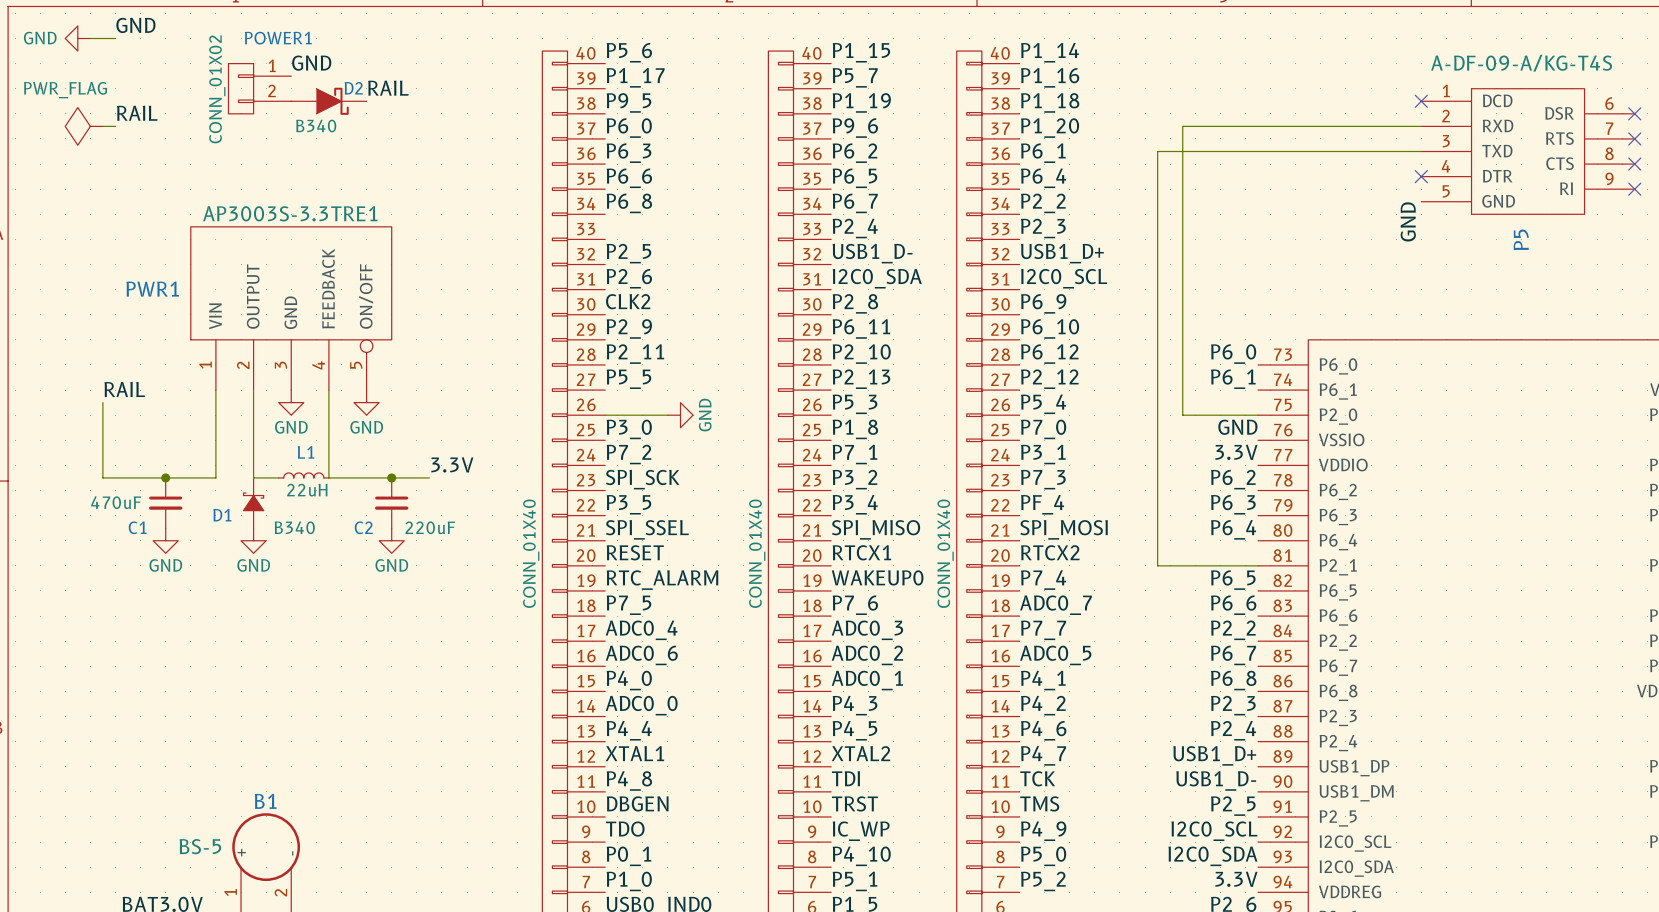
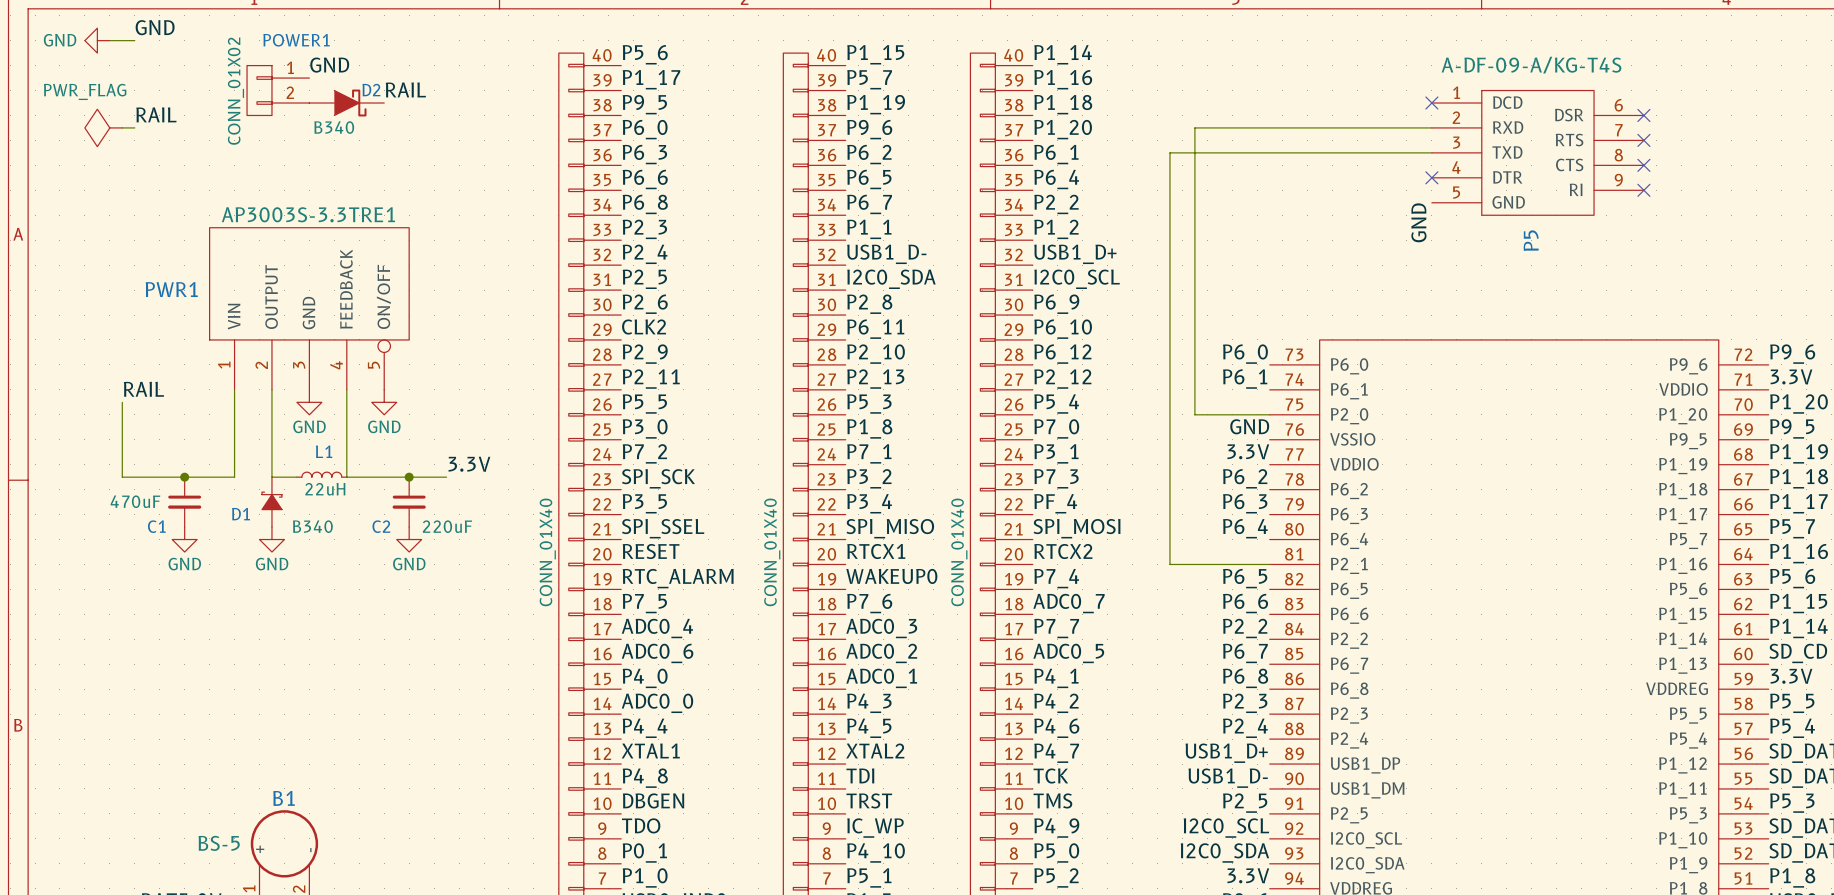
label: none -> P2_3 (644, 229)
label: P2_4 (855, 228) -> P1_1 (869, 229)
label: P2_3 (1043, 228) -> P1_2 (1056, 229)
label: P2_5 (628, 253) -> P2_4 (645, 254)
label: P2_6 (629, 278) -> P2_5 (644, 279)
label: CLK2 (628, 301) -> P2_6 (645, 304)
label: P2_9 (629, 328) -> CLK2 (644, 327)
label: P2_11 (635, 354) -> P2_9 (645, 354)
label: P5_5 (628, 379) -> P2_11 (651, 379)
label: none -> P5_5 (644, 404)
wire: (605, 415) (667, 415) -> none
power symbol: GND (680, 415) -> none

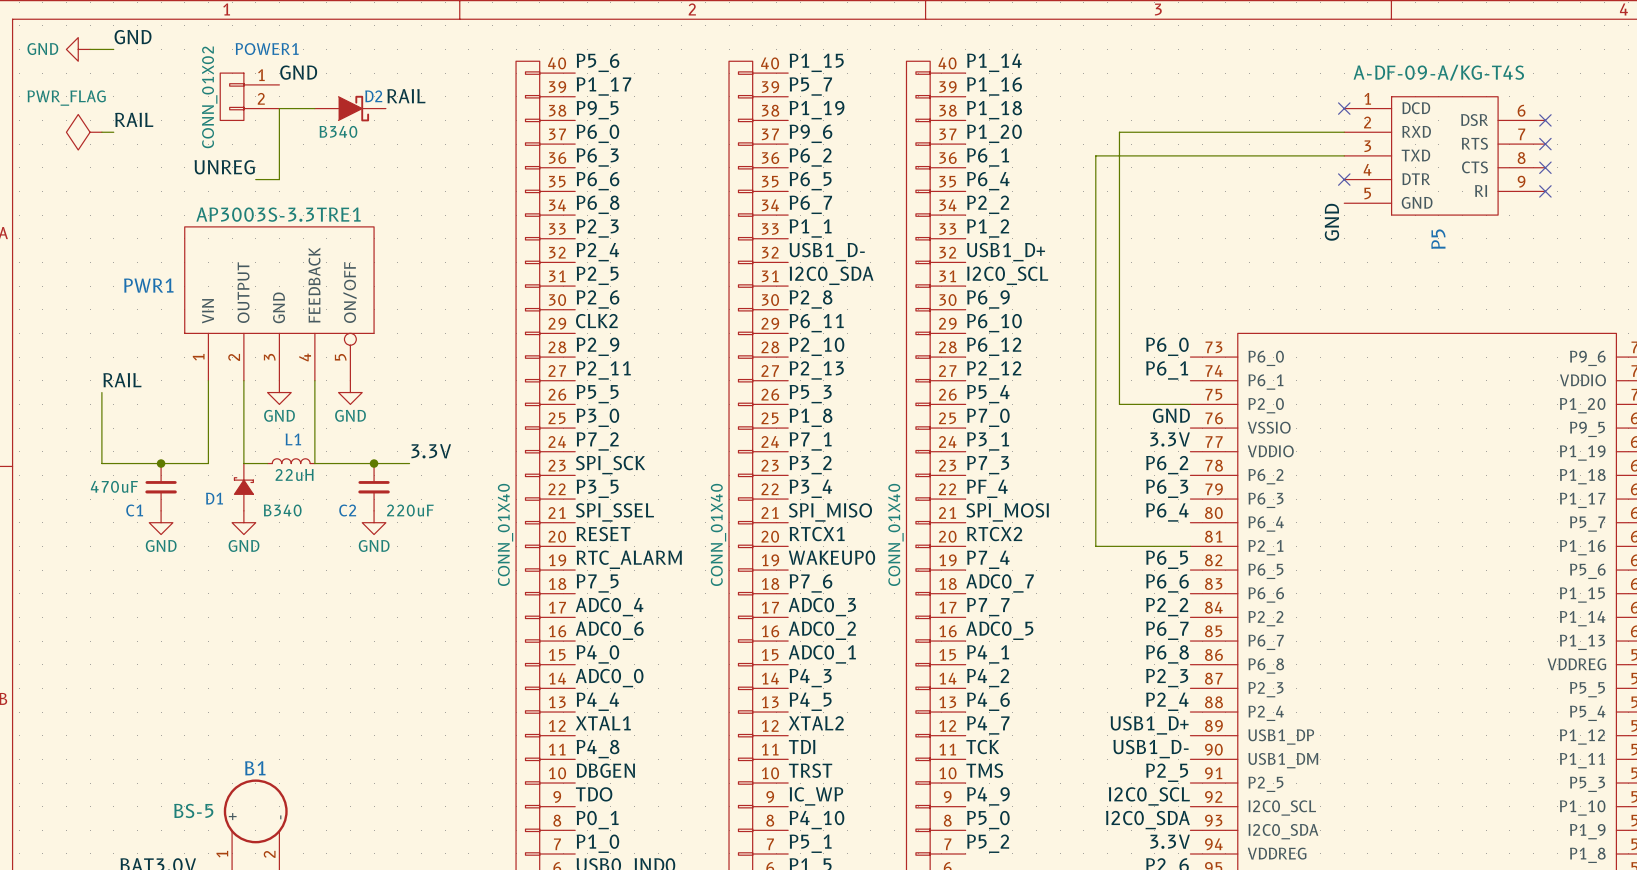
label position: RAIL (405, 89) -> RAIL (406, 96)
wire: none -> (314, 108) (279, 108) (279, 179) (255, 179)
D2 position: (346, 103) -> (350, 108)
label: none -> UNREG (224, 167)

